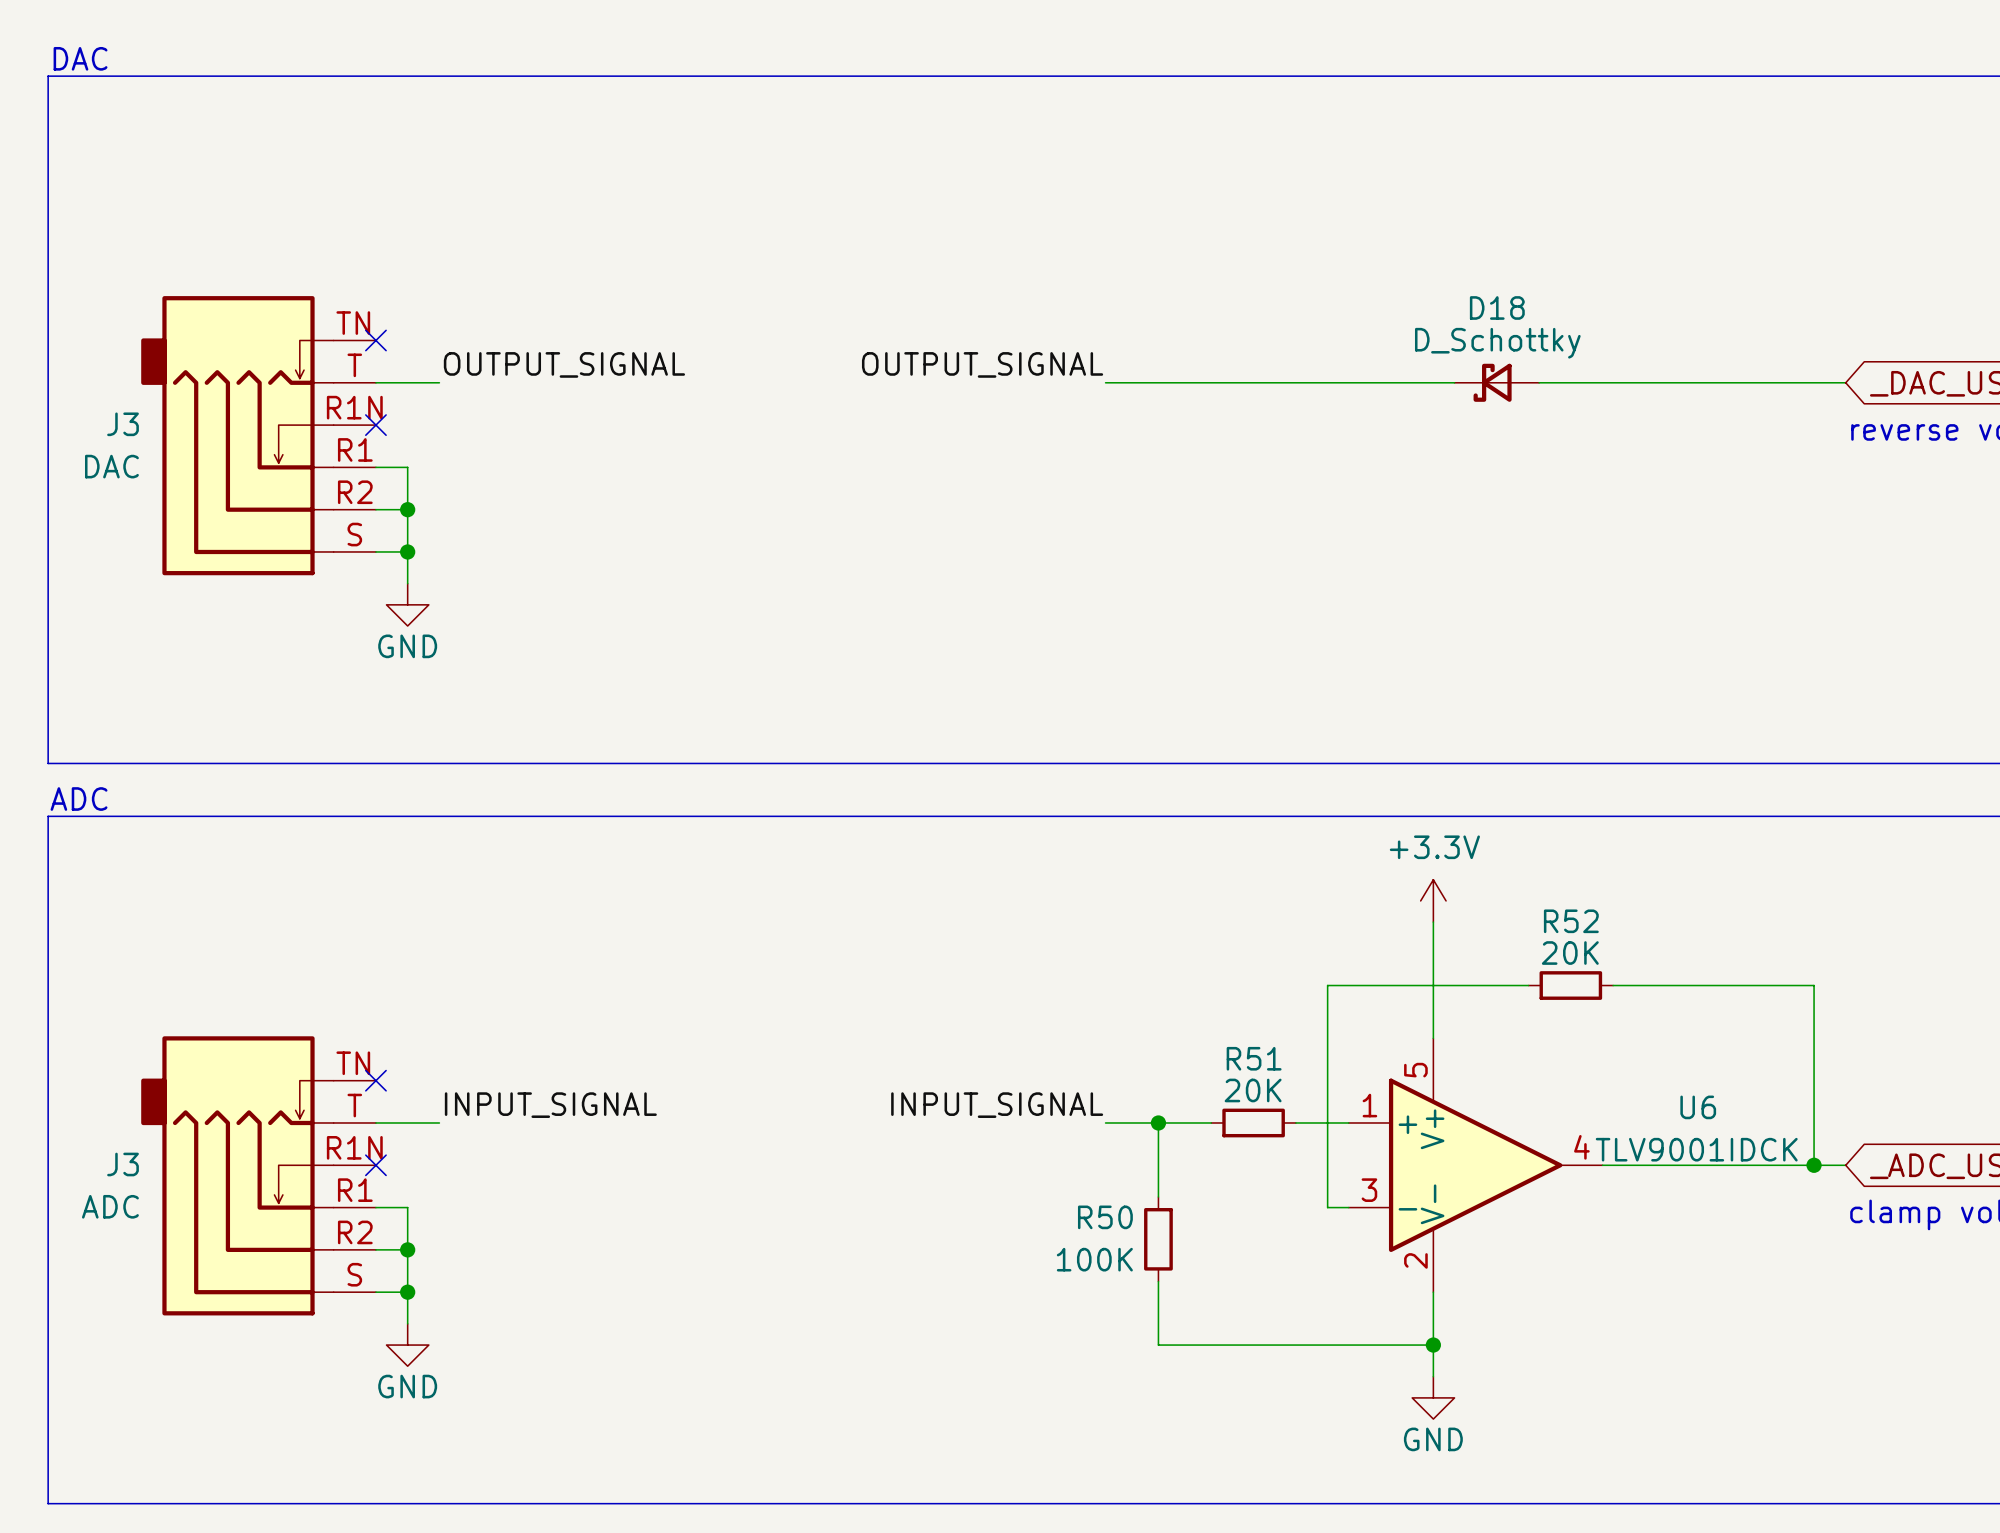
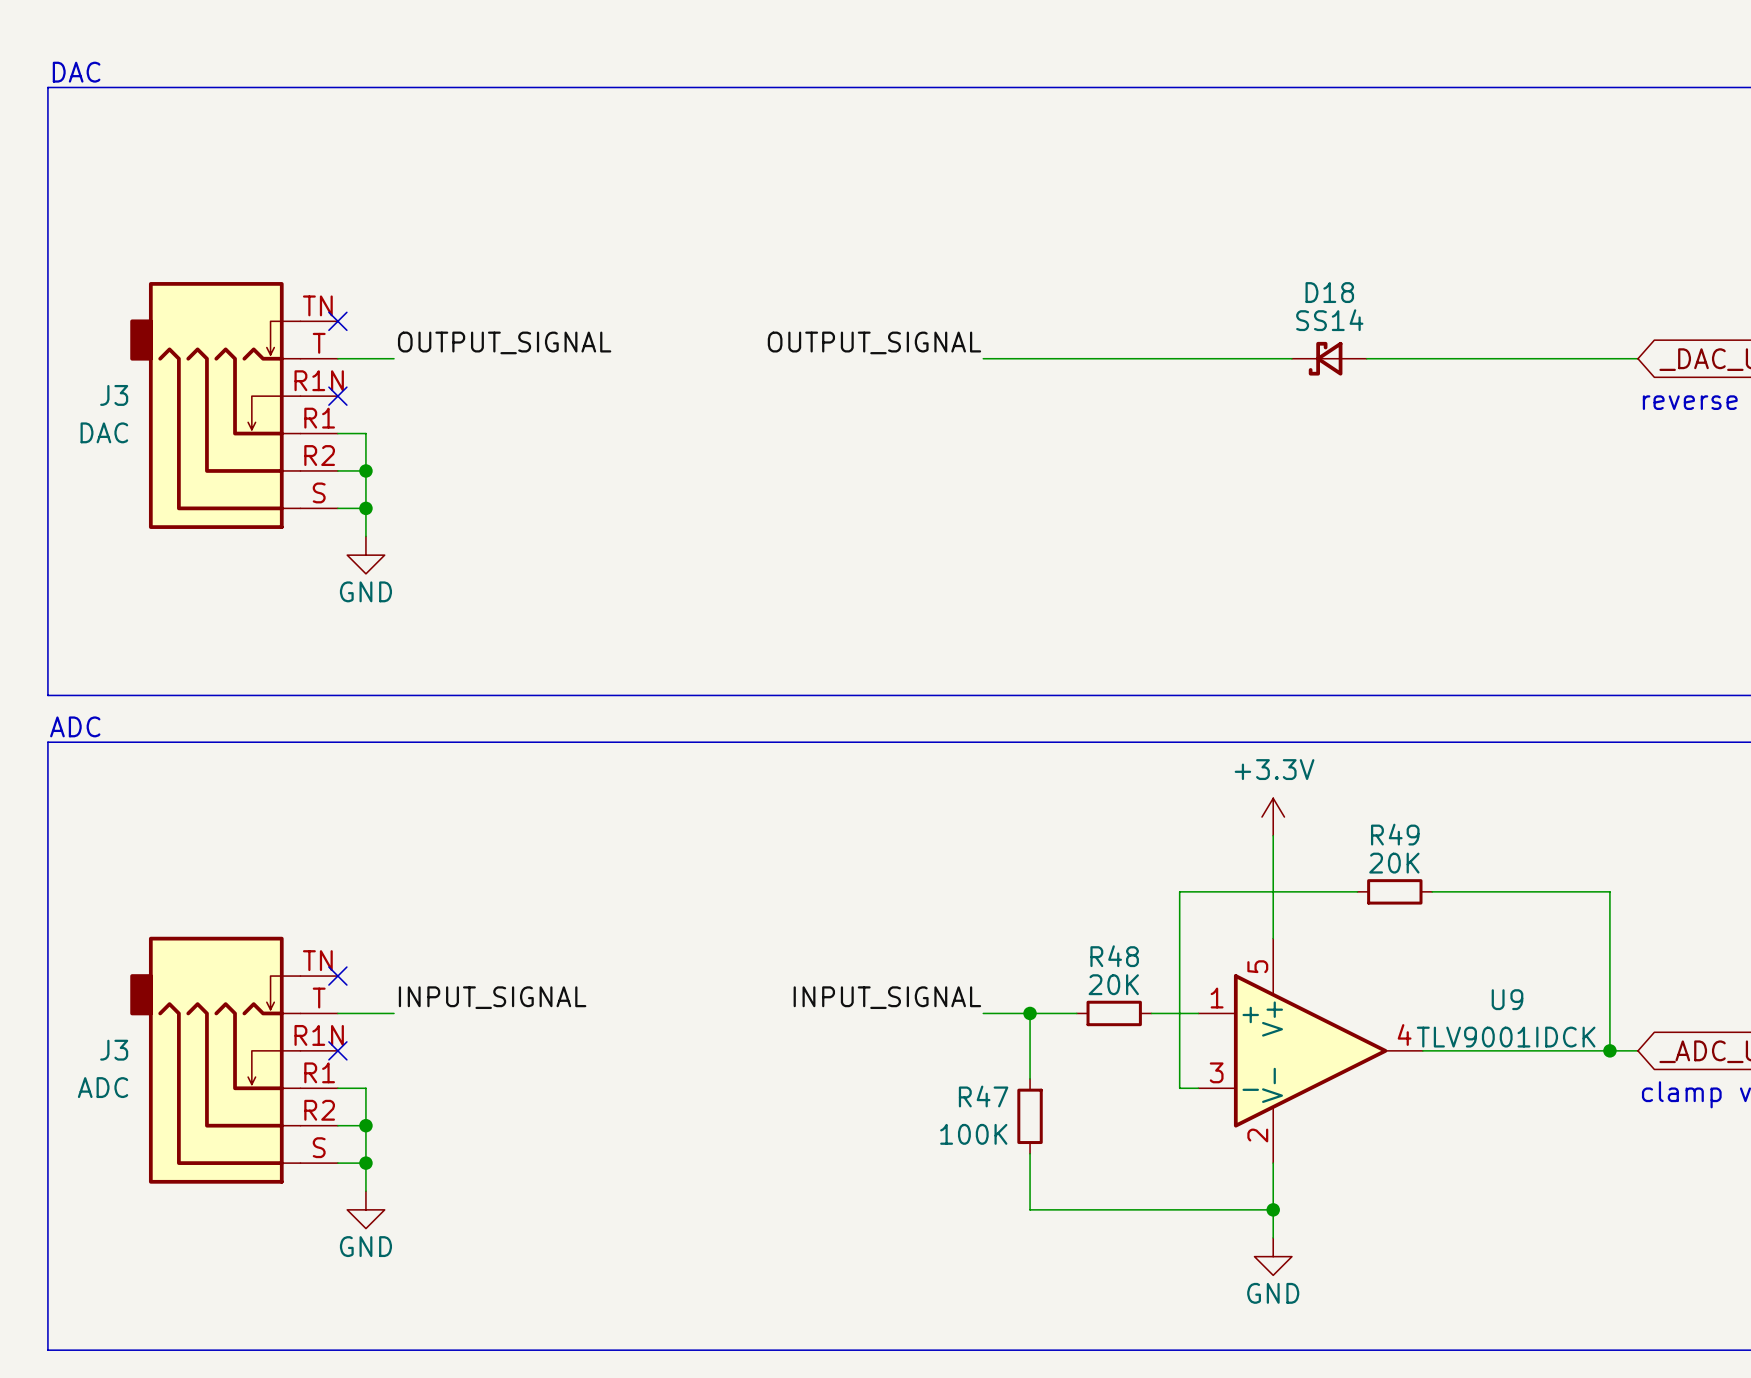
D18 value: D_Schottky (1497, 343) -> SS14 (1329, 320)
R52 name: R52 (1571, 921) -> R49 (1395, 834)
R51 name: R51 (1254, 1058) -> R48 (1114, 956)
U6 name: U6 (1698, 1107) -> U9 (1507, 999)
R50 name: R50 (1105, 1217) -> R47 (983, 1096)

